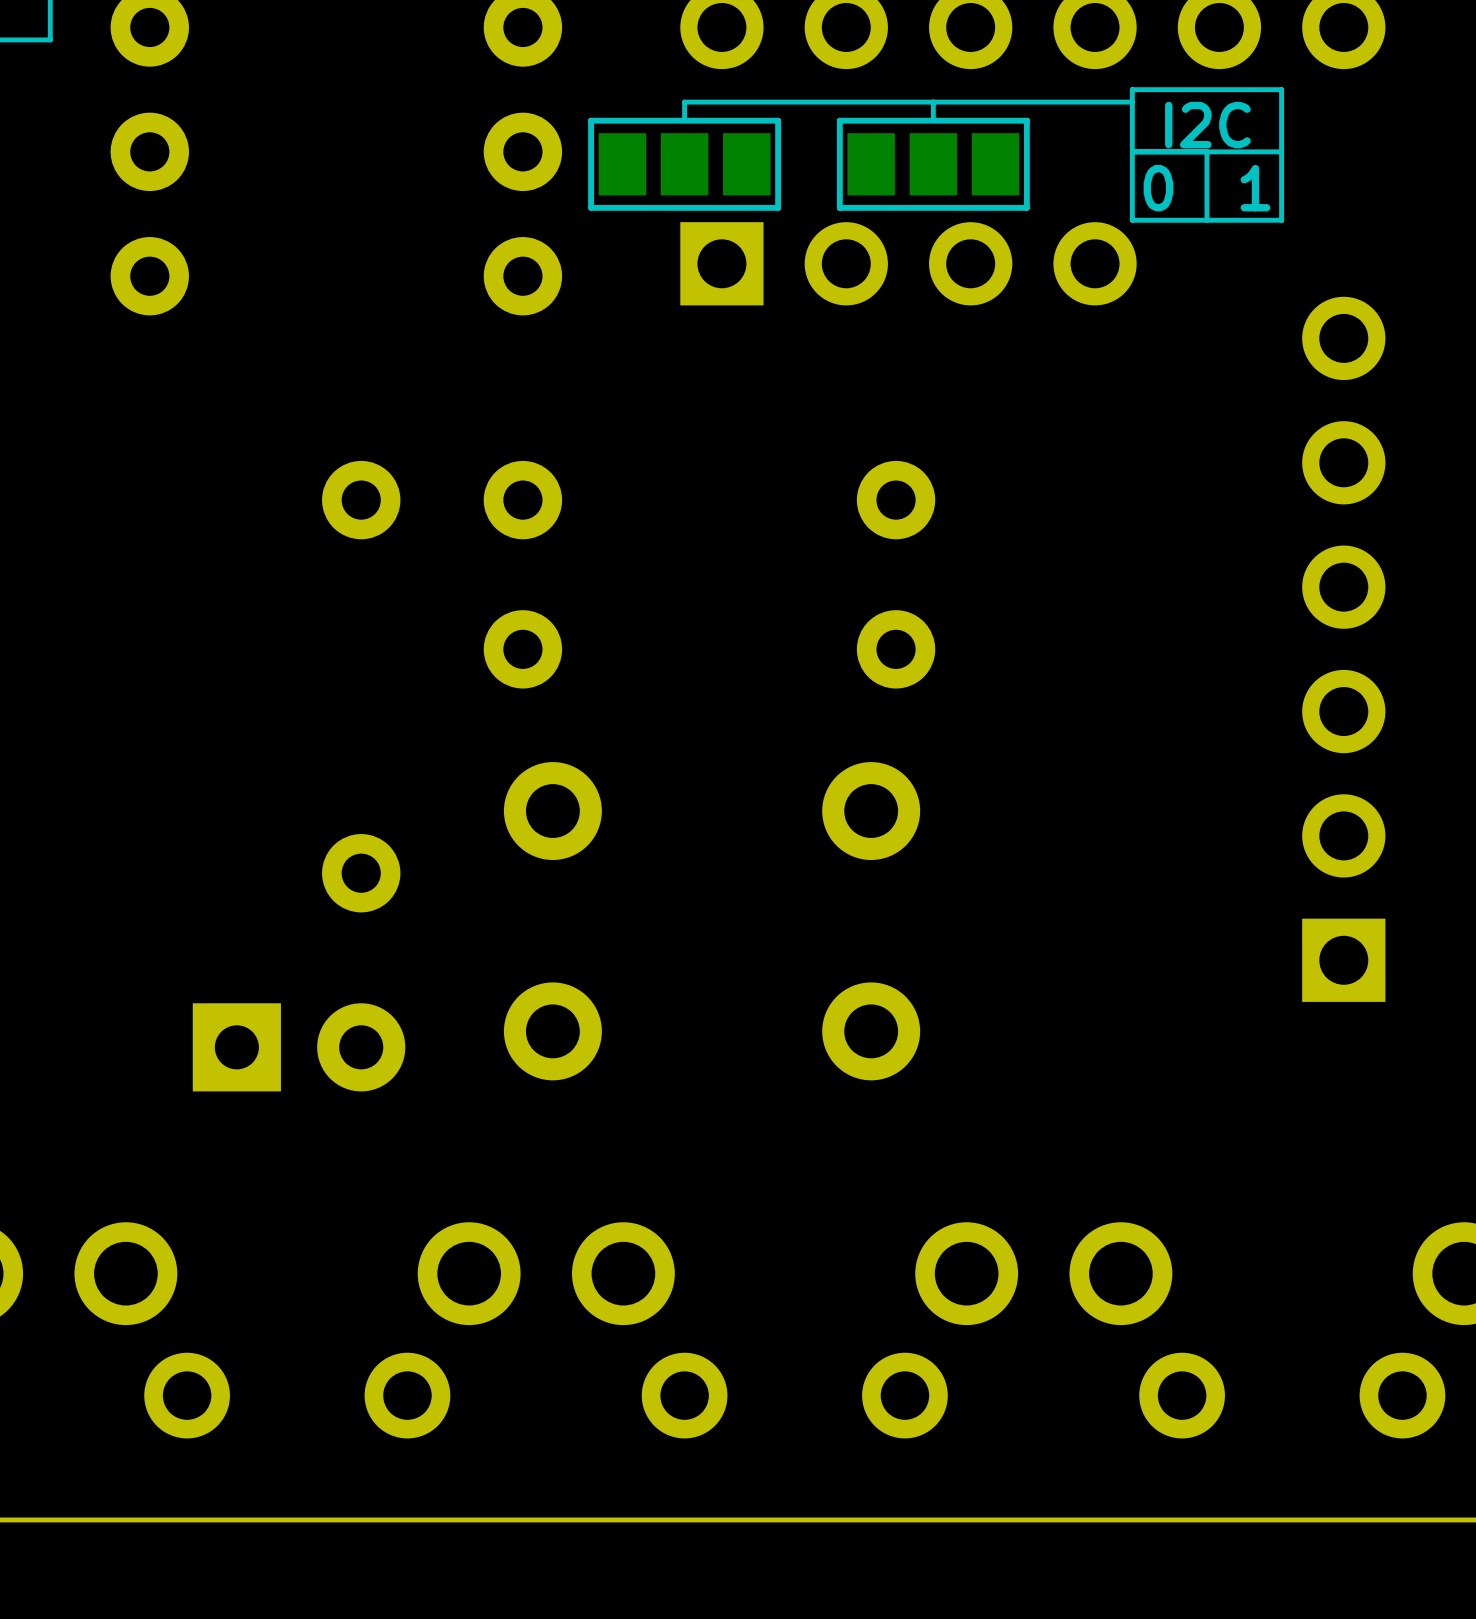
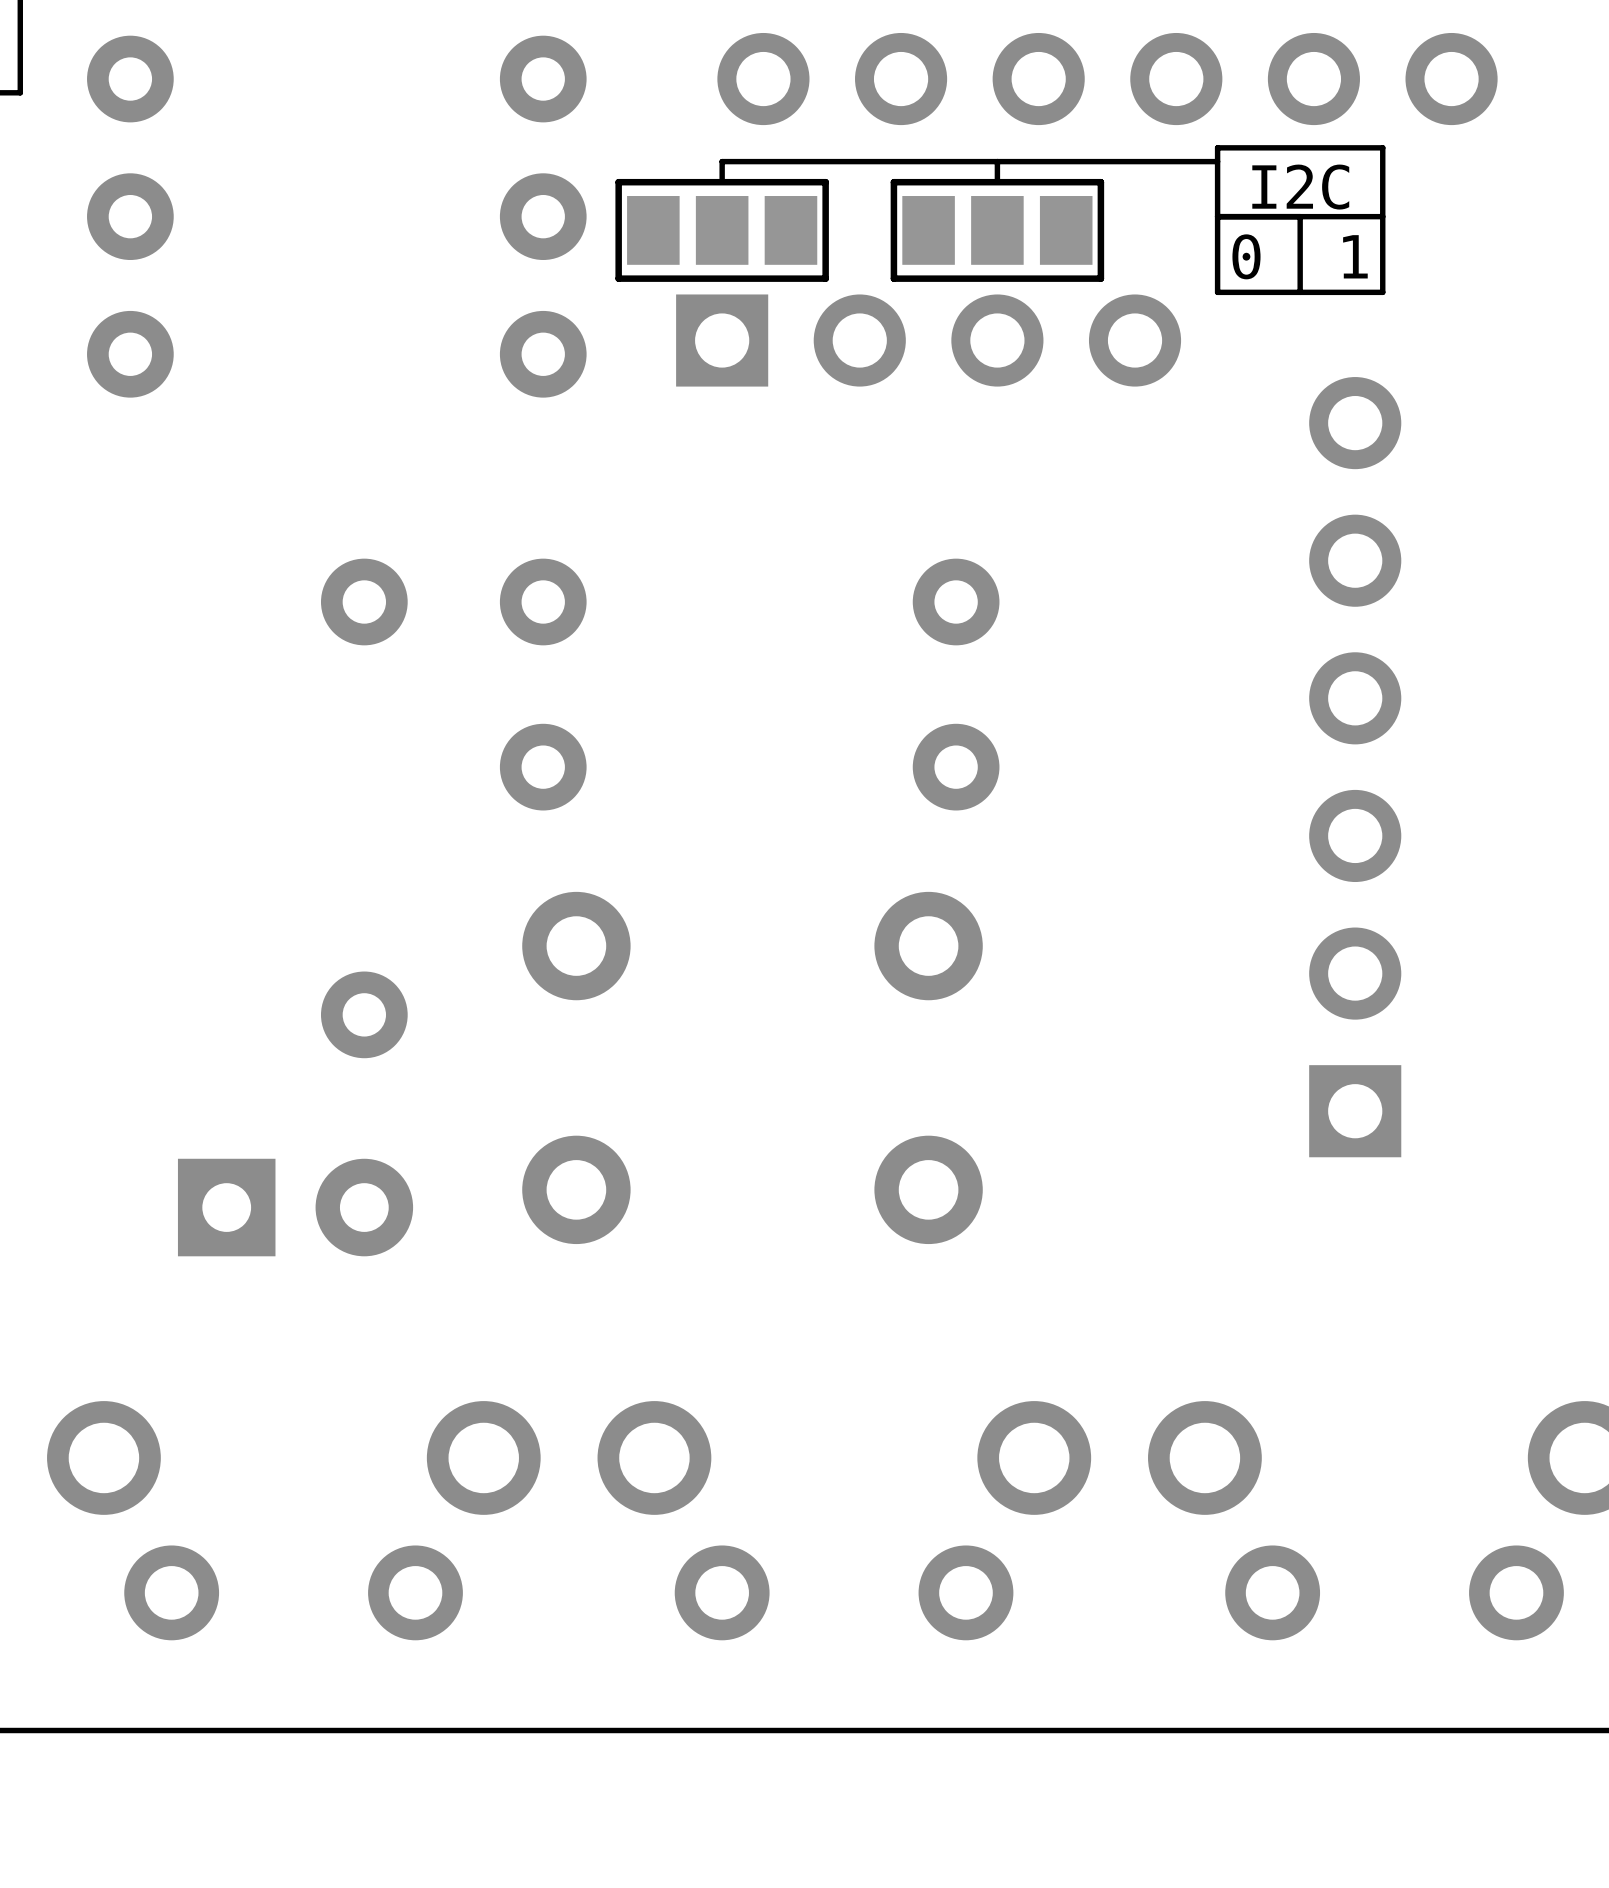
part position: (908, 263) -> (928, 340)
part position: (1343, 649) -> (1355, 767)

